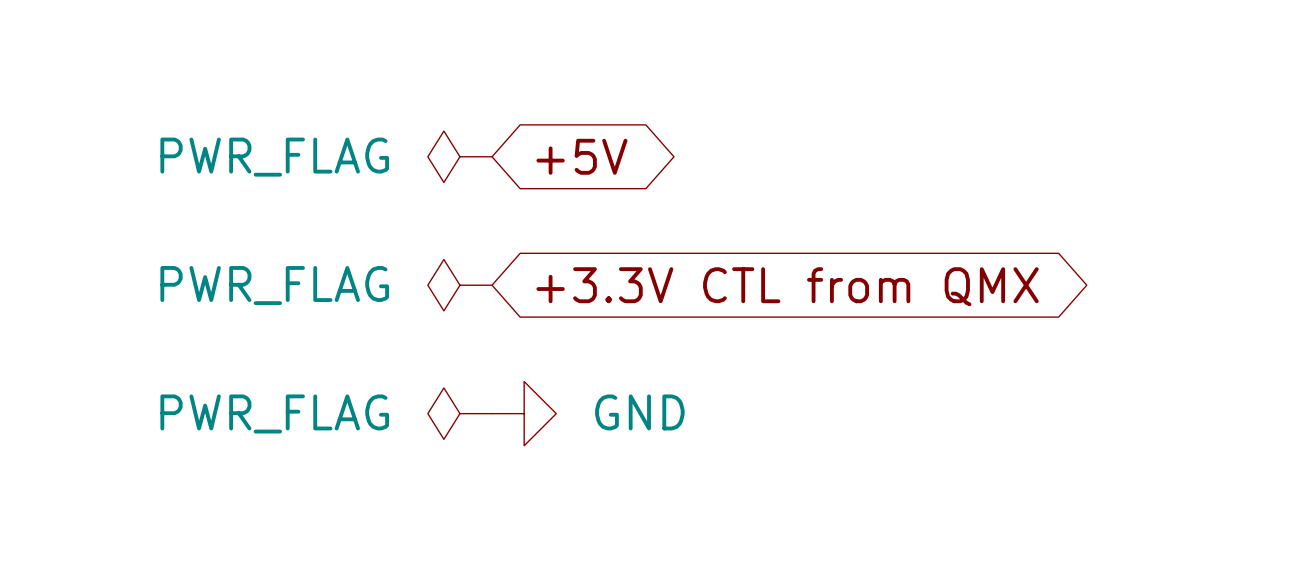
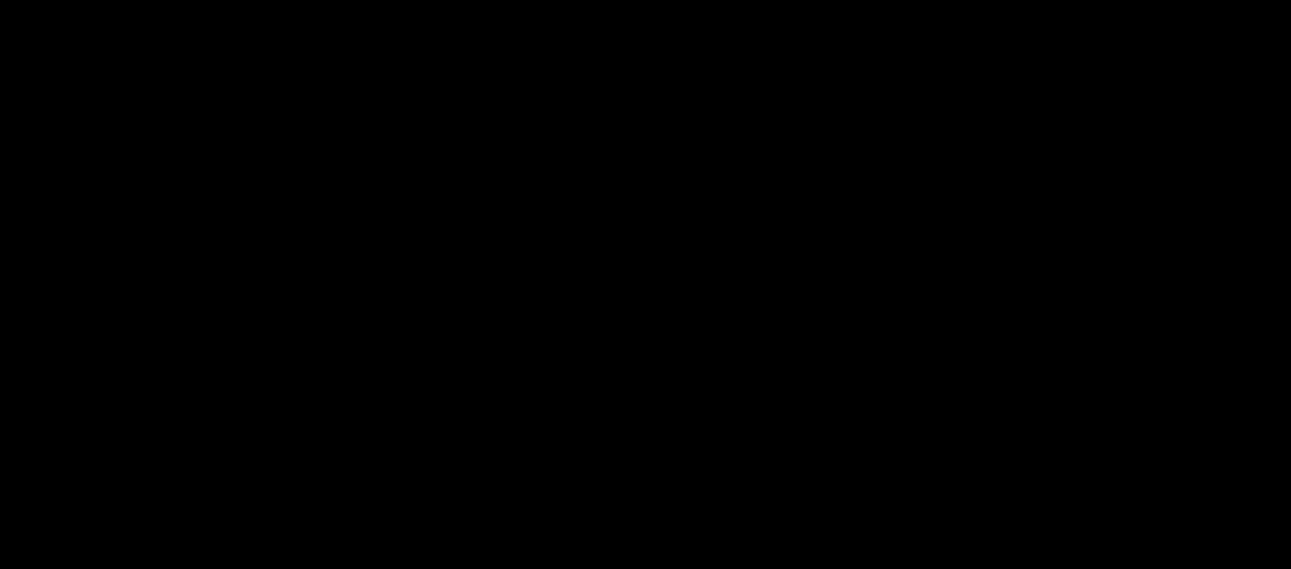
power symbol: PWR_FLAG (459, 156) -> none
global label: +5V (581, 156) -> none
power symbol: PWR_FLAG (459, 285) -> none
global label: +3.3V CTL from QMX (787, 286) -> none
power symbol: PWR_FLAG (459, 413) -> none
power symbol: GND (524, 413) -> none

